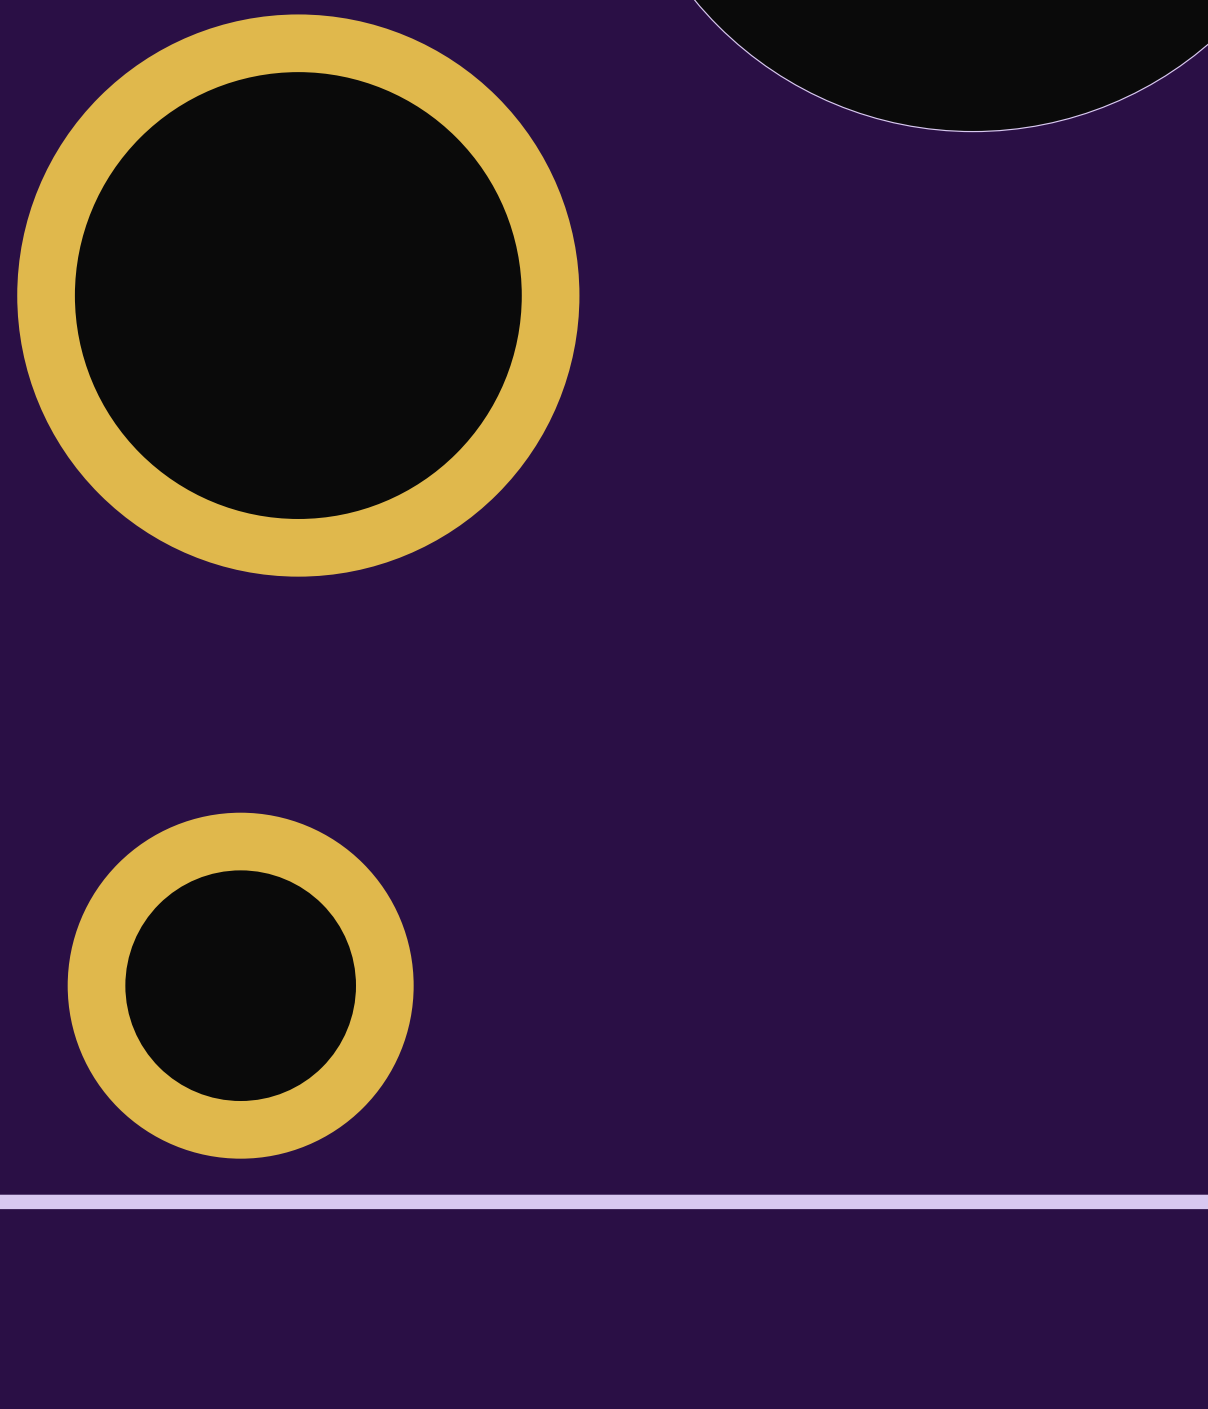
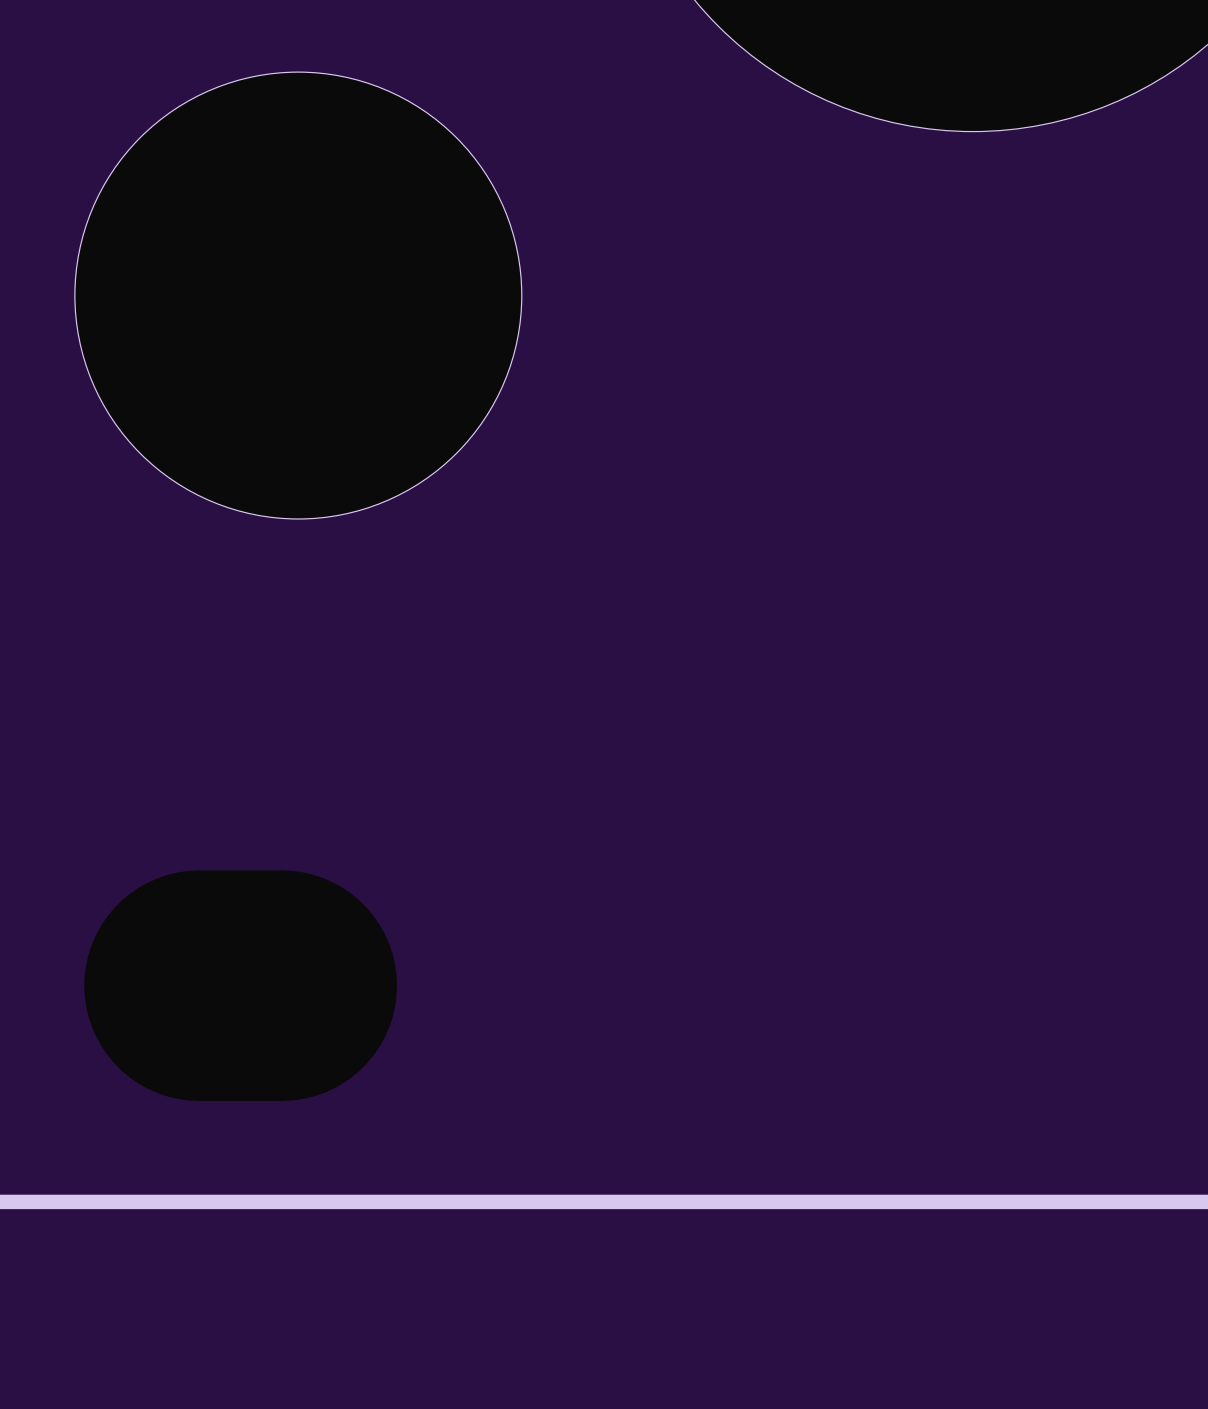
part footprint: [17, 14, 580, 577] -> [74, 72, 522, 519]
part footprint: [67, 812, 414, 1159] -> [84, 870, 398, 1102]

